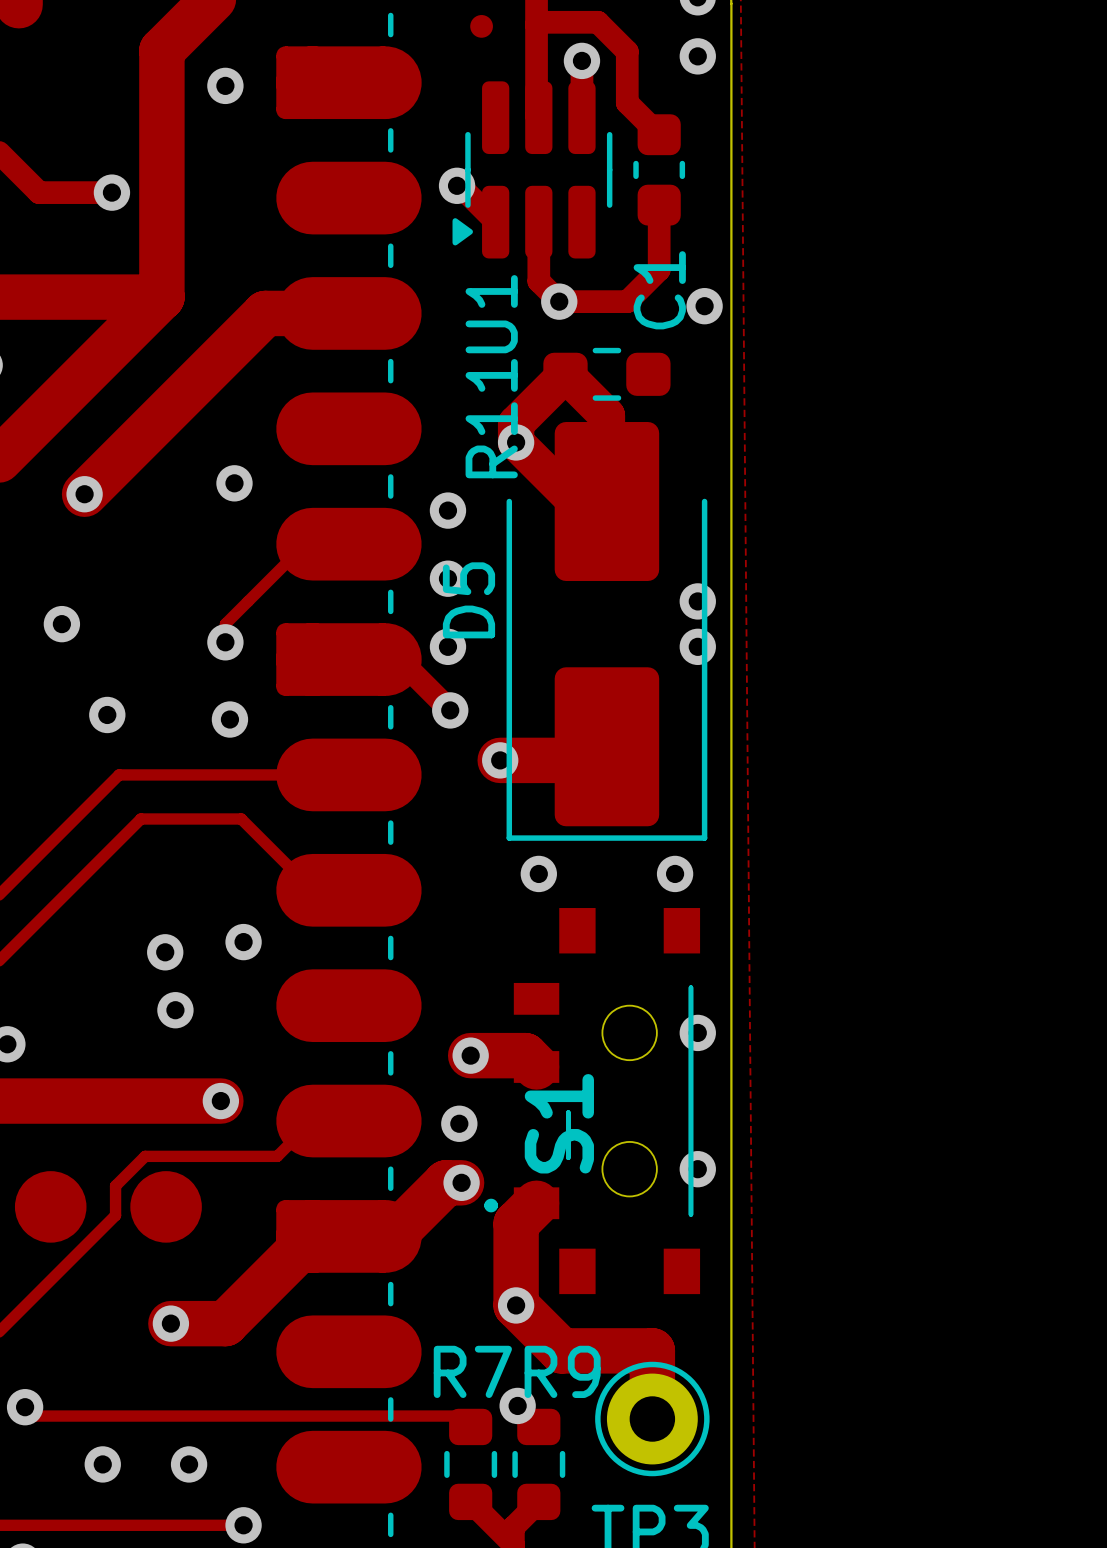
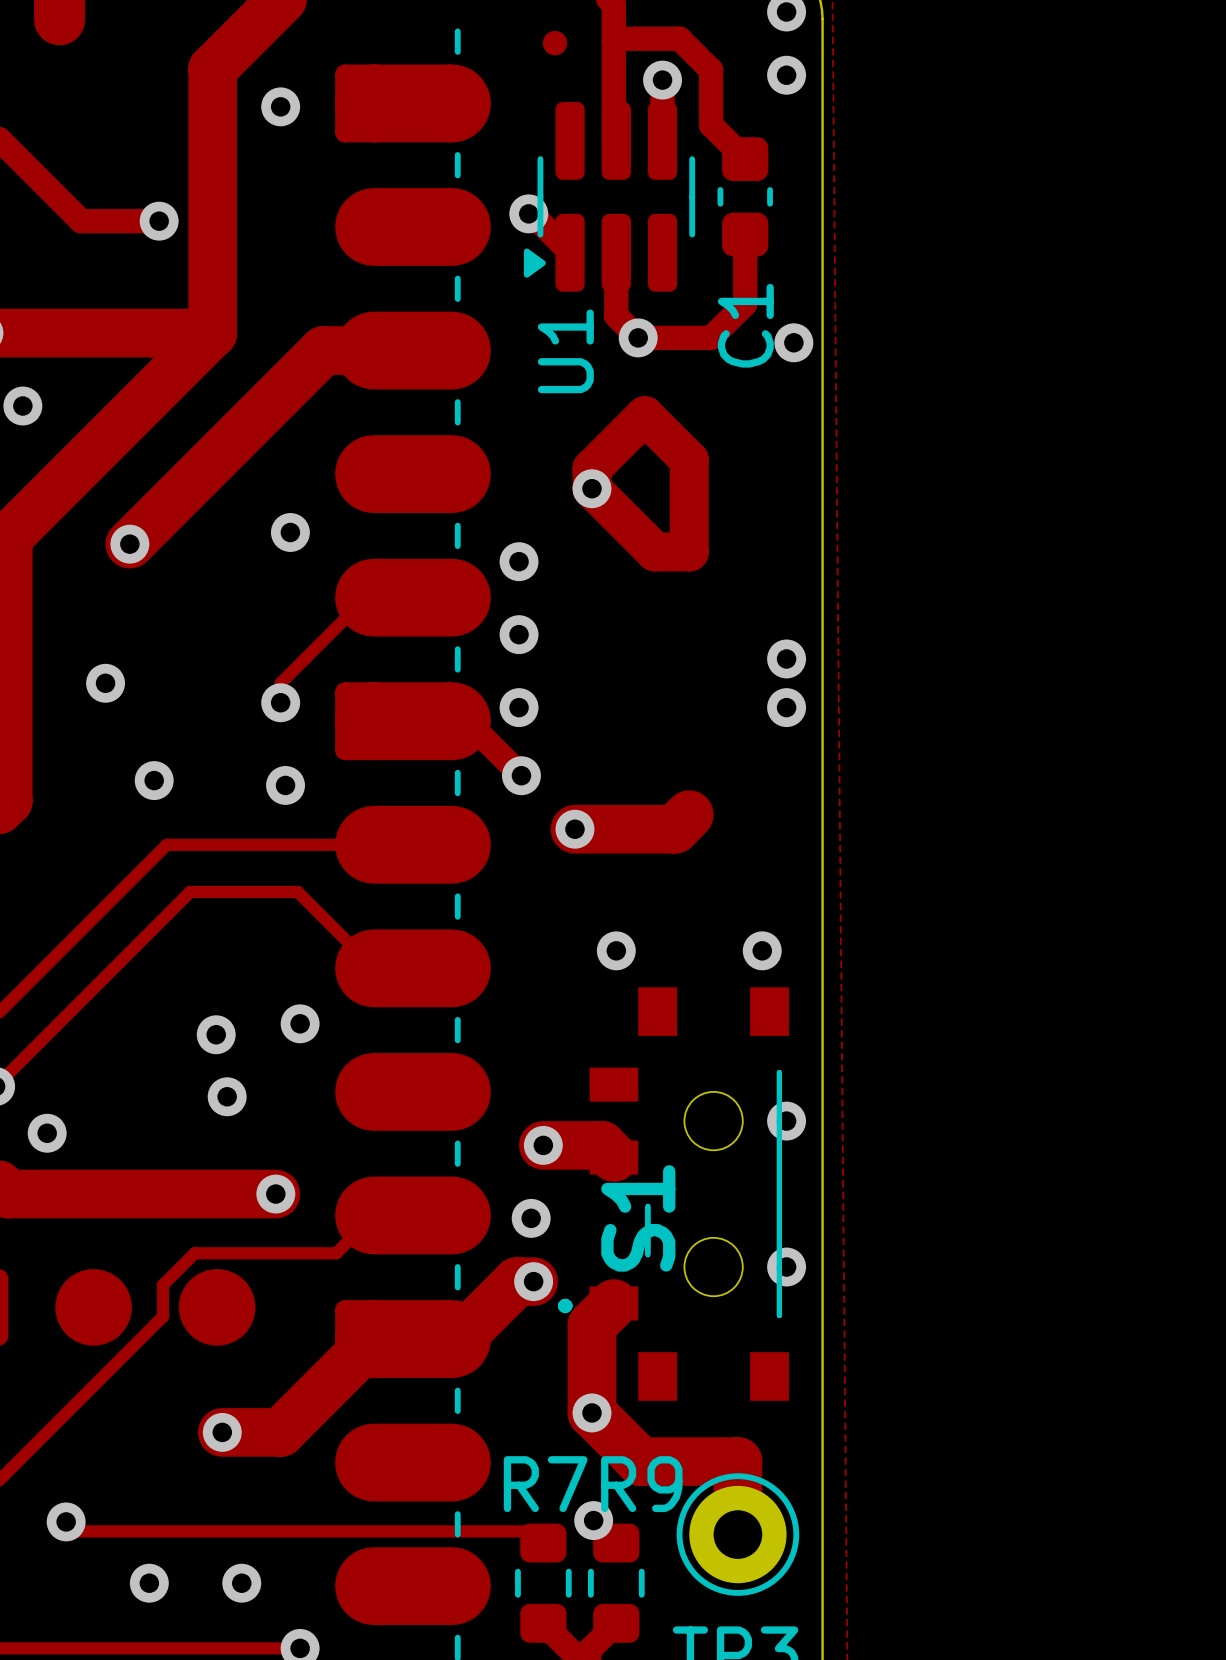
R11: (606, 374) -> none
D5: (606, 631) -> none

